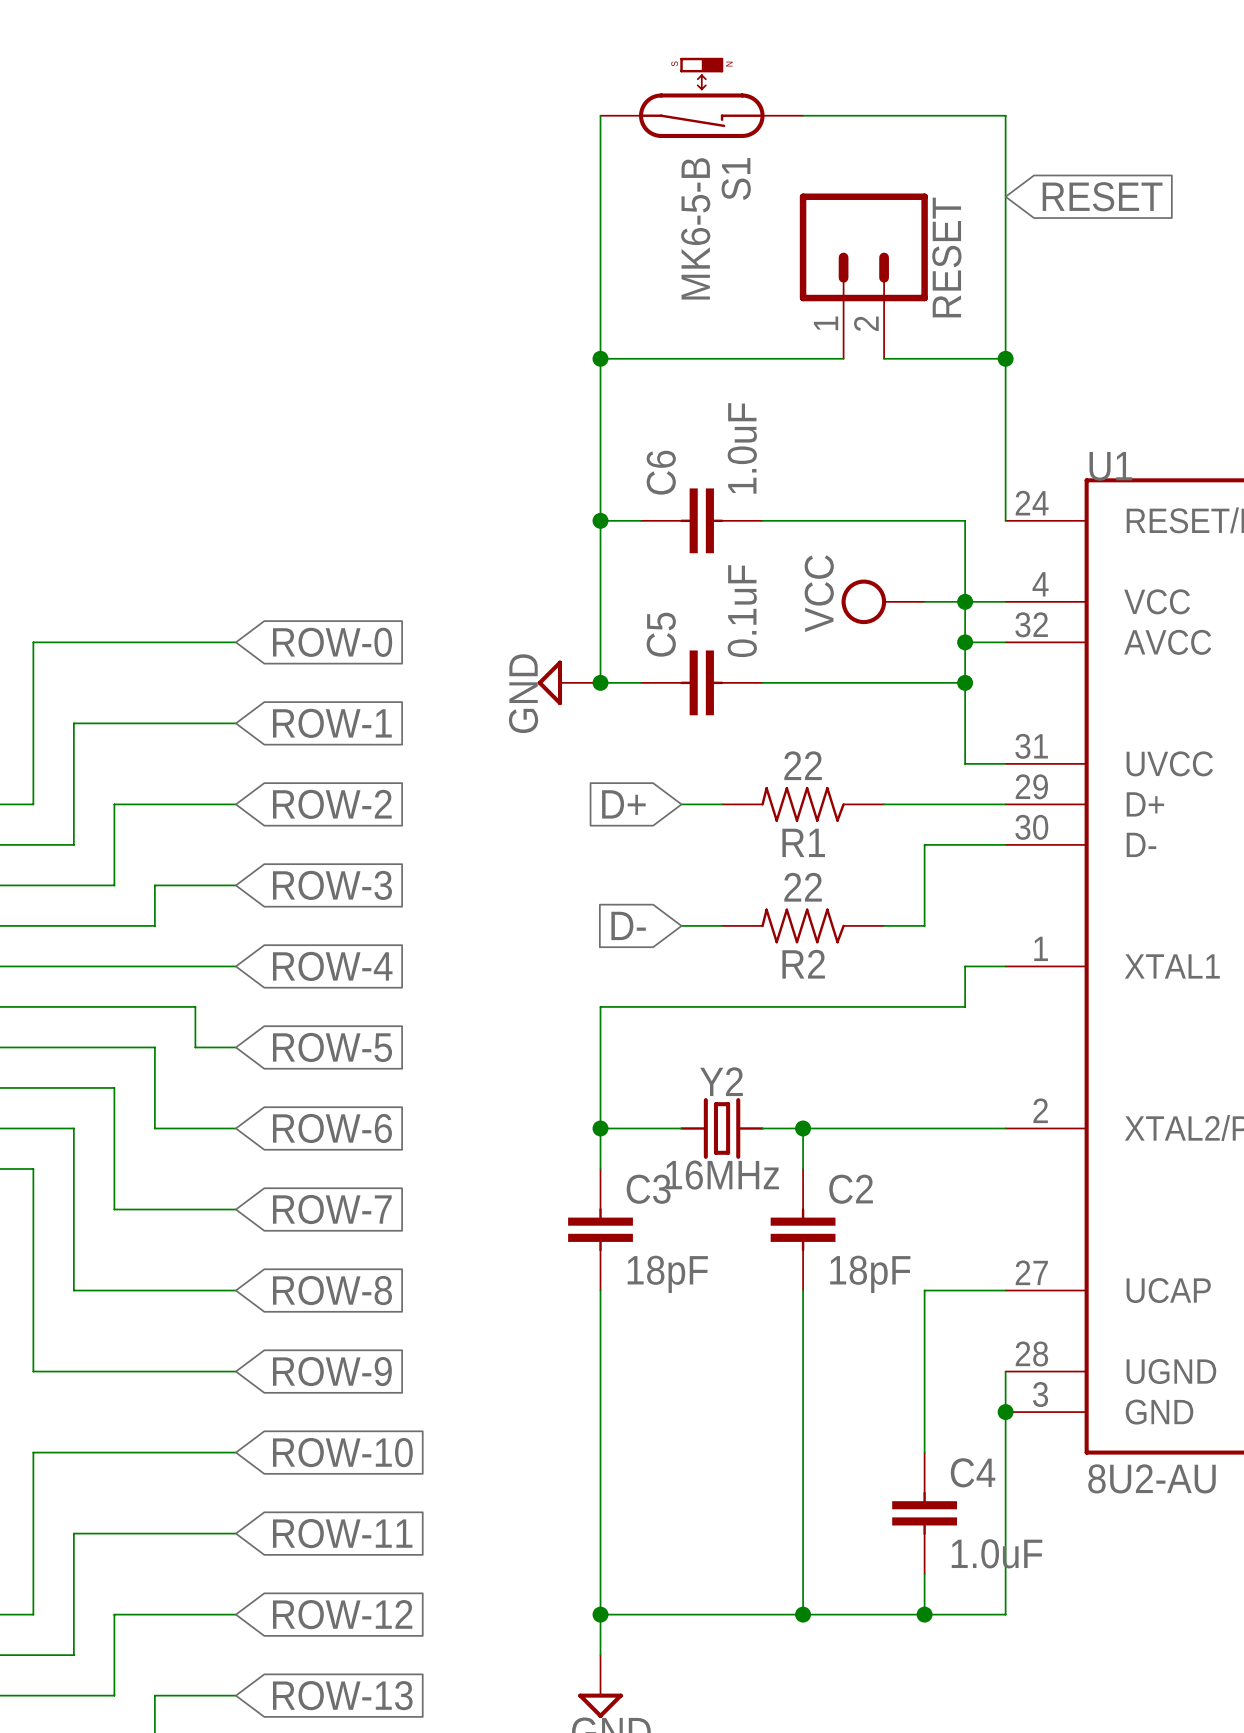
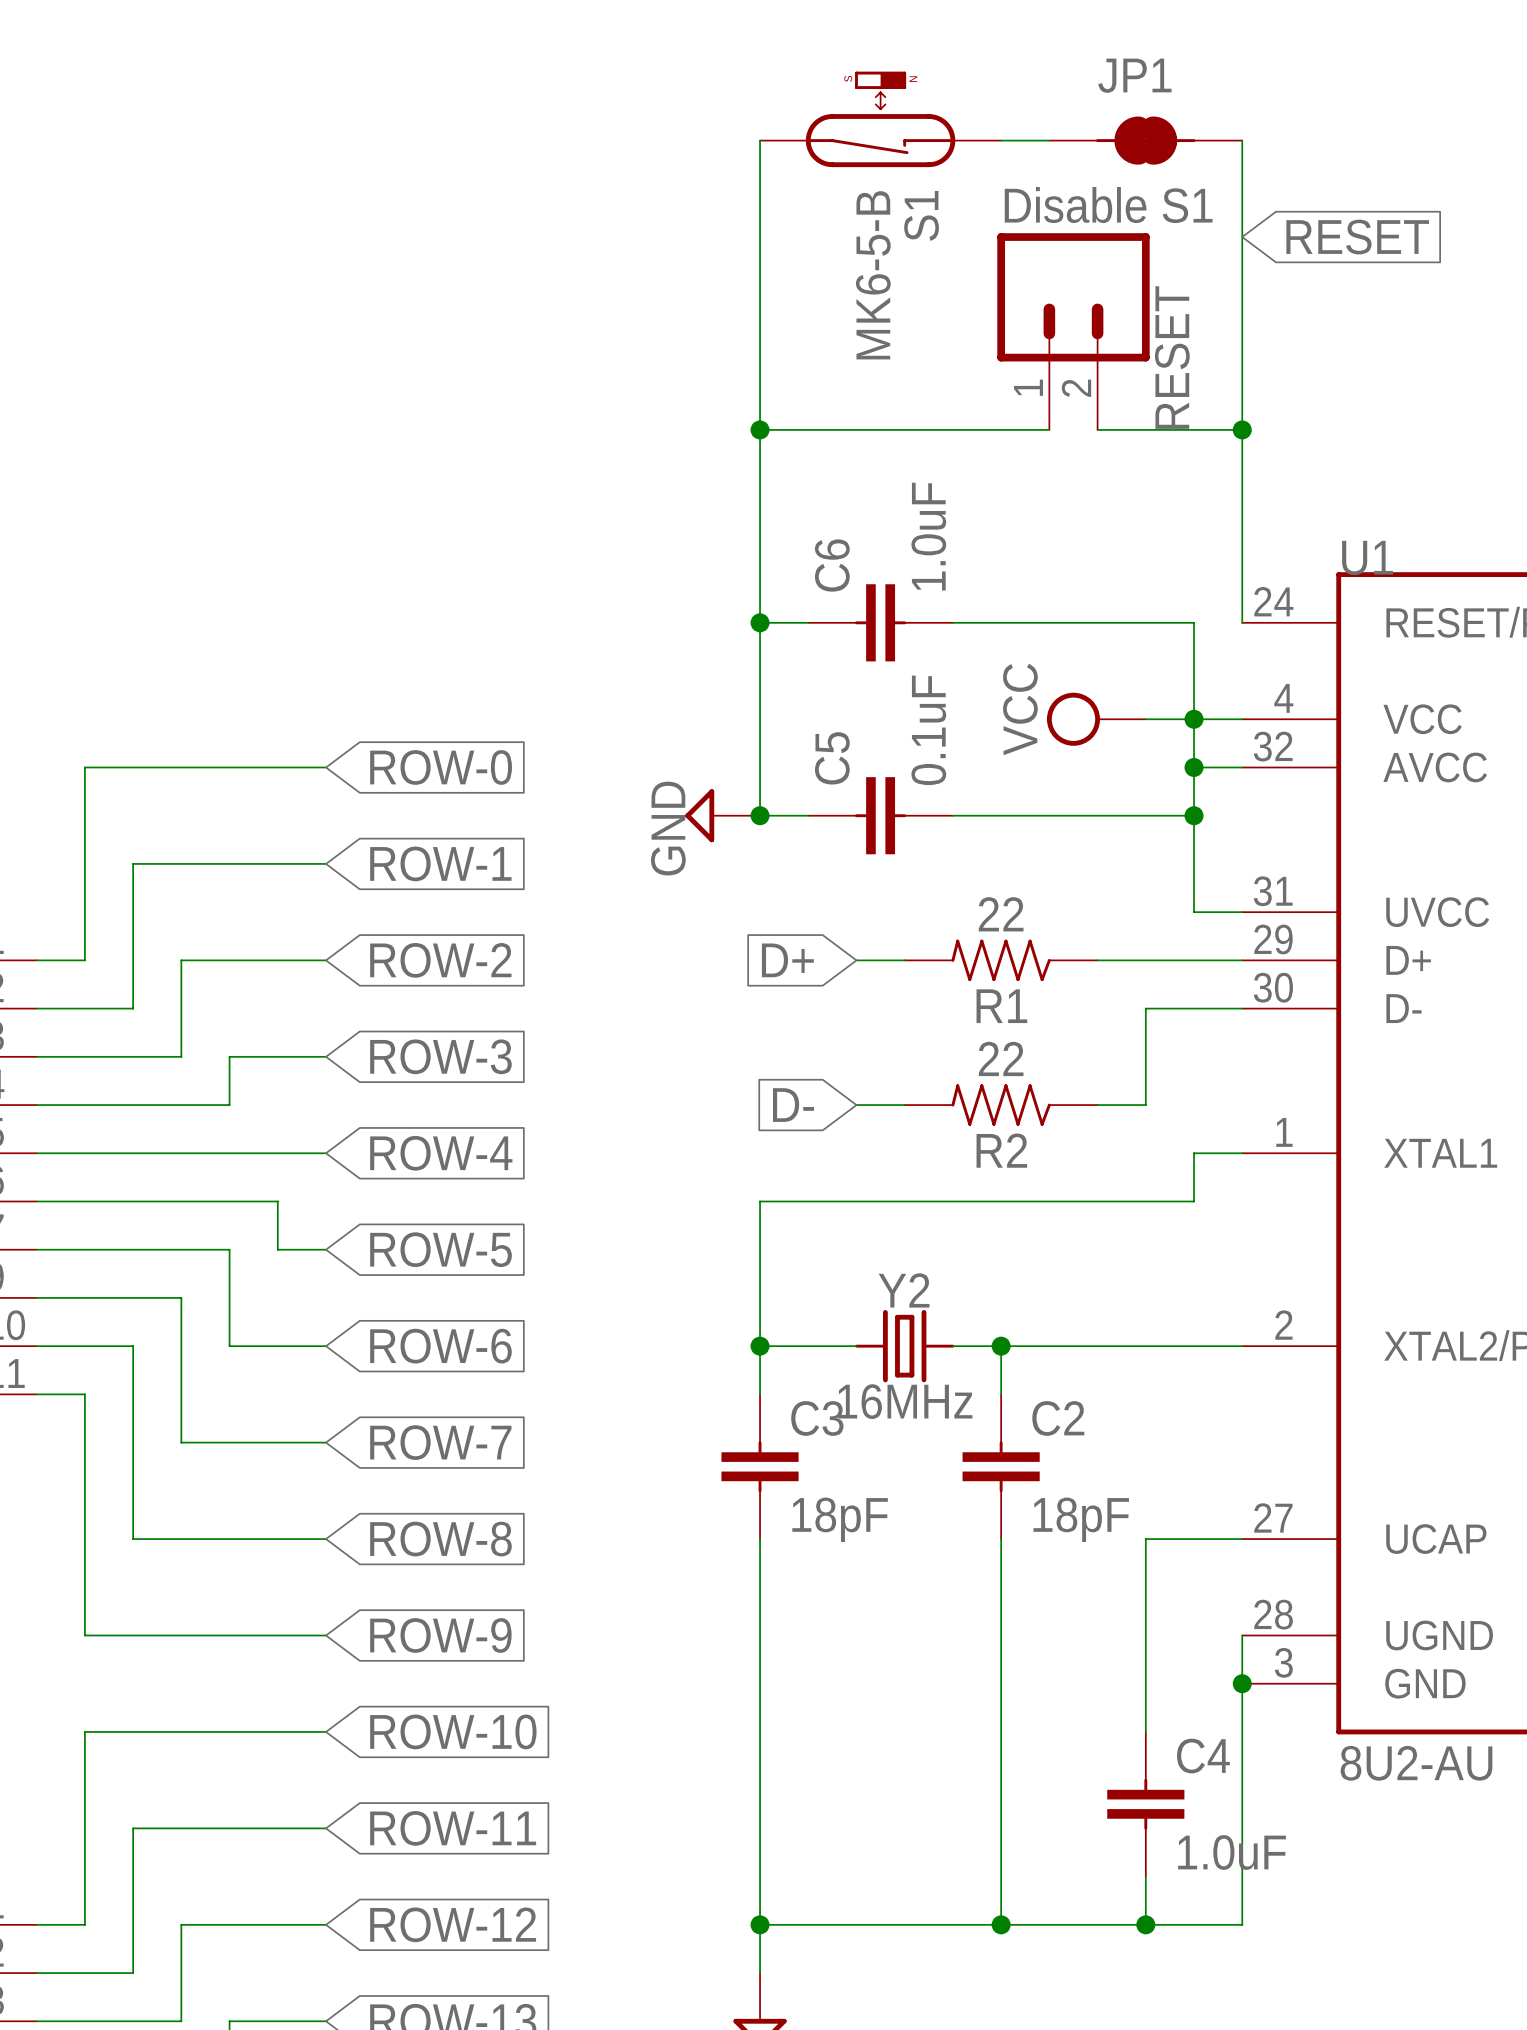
JP1: none -> Disable S1 (1145, 140)
RESET name position: RESET (946, 257) -> RESET (1172, 357)

